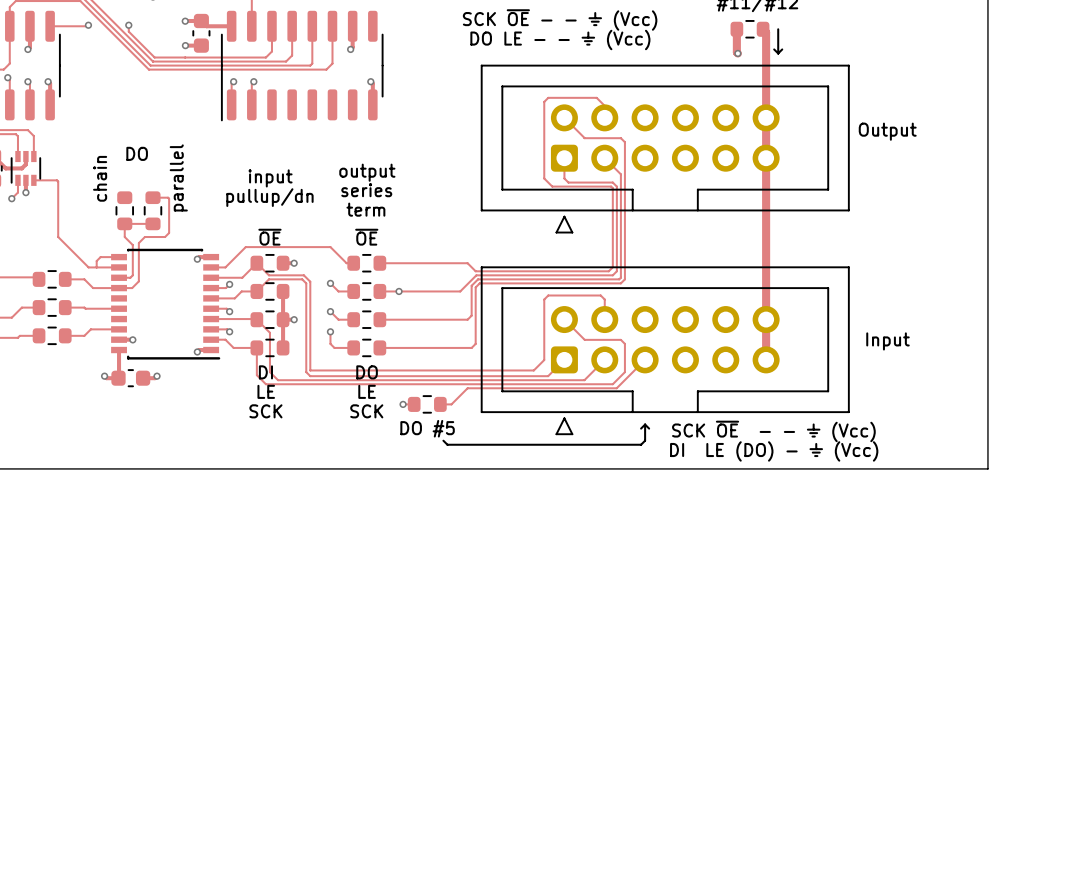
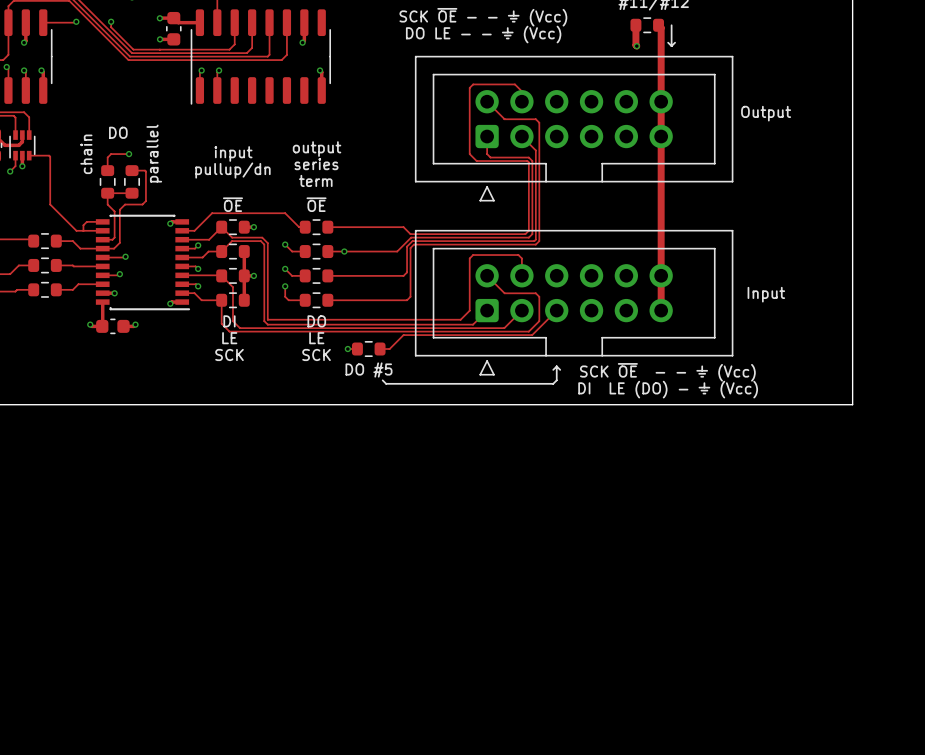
track: none -> (129, 154) (111, 154) (107, 157) (107, 170)
via: none -> (129, 154)
track: none -> (125, 256) (102, 257)
via: none -> (125, 256)
track: none -> (119, 274) (102, 275)
via: none -> (119, 274)

